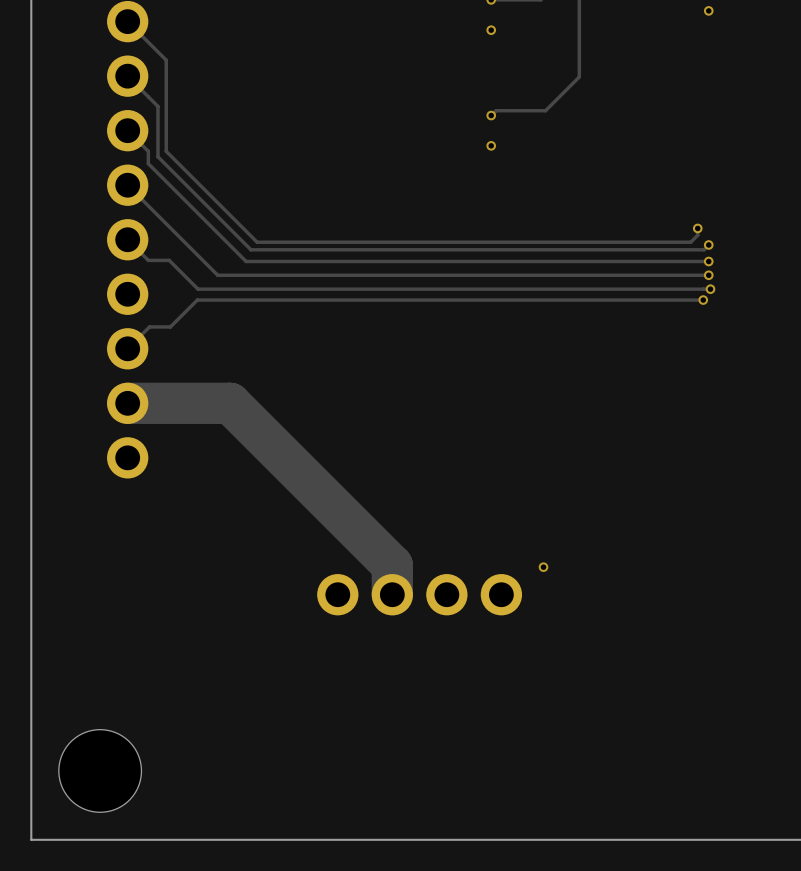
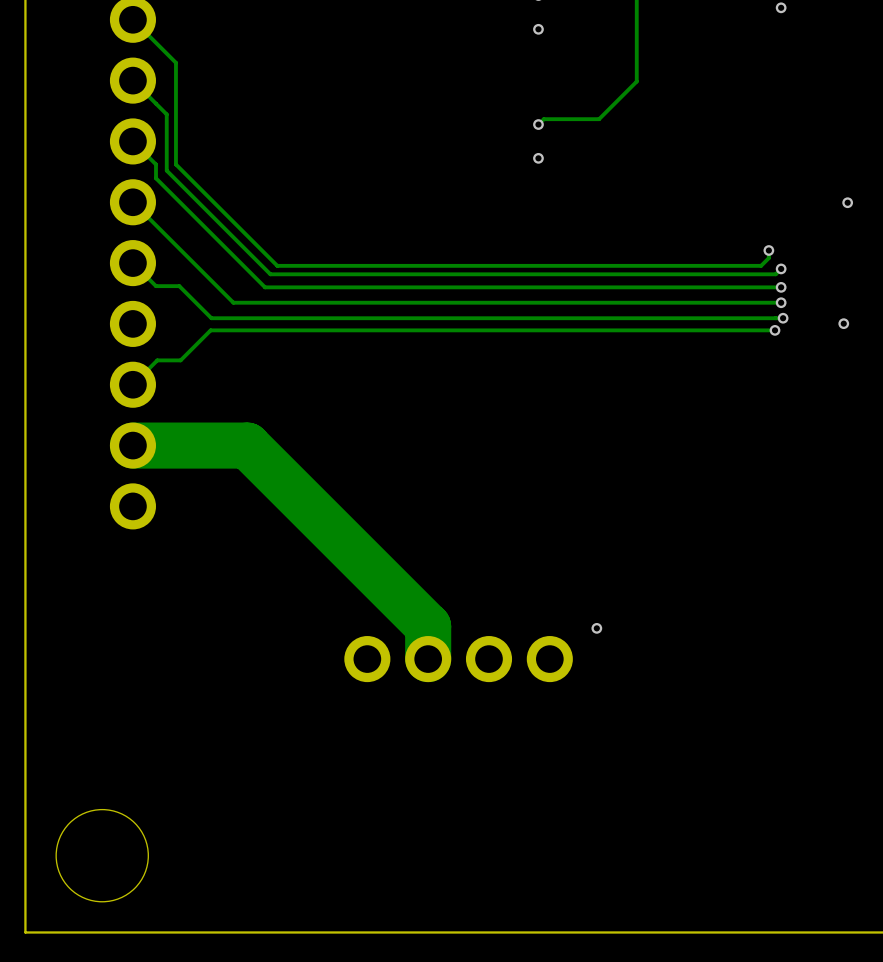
via: none -> (847, 202)
via: none -> (843, 323)

